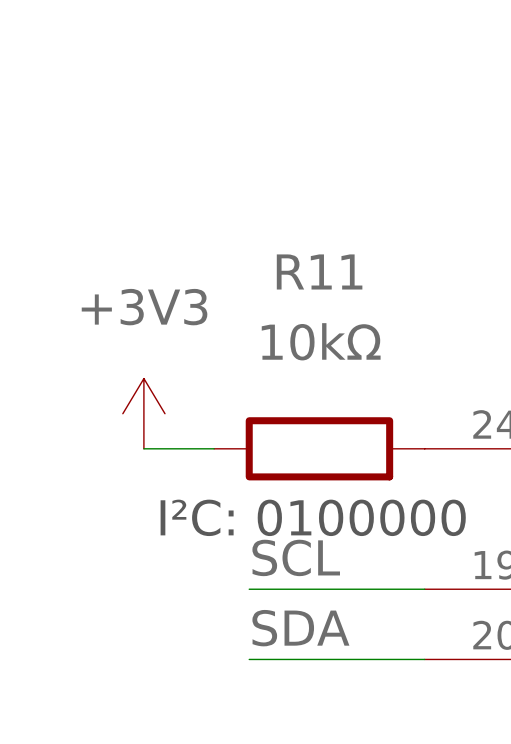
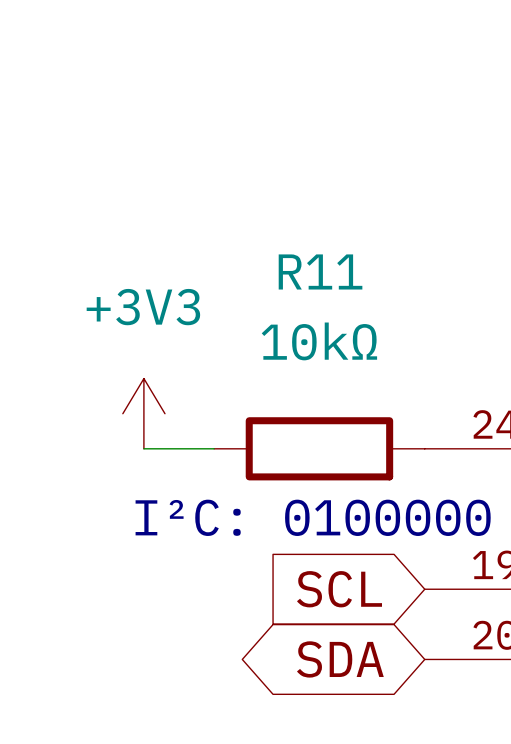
label: SCL (296, 557) -> none
wire: (249, 589) (424, 589) -> none
global label: none -> SCL (339, 589)
label: SDA (300, 628) -> none
wire: (249, 659) (424, 659) -> none
global label: none -> SDA (340, 659)

